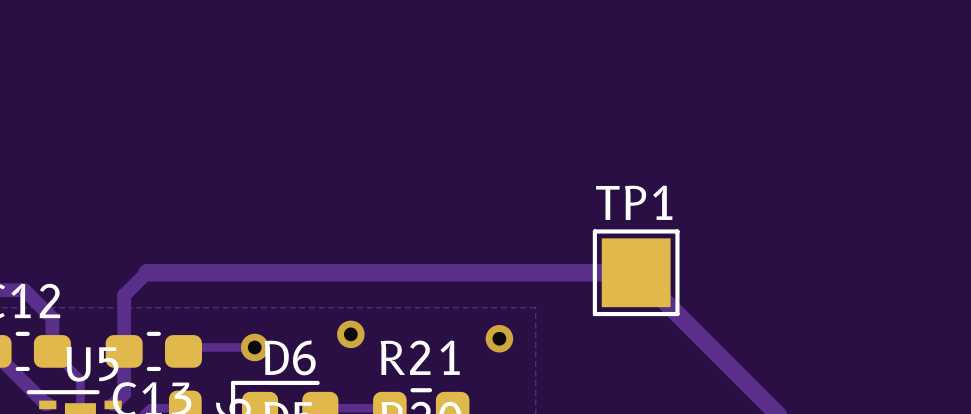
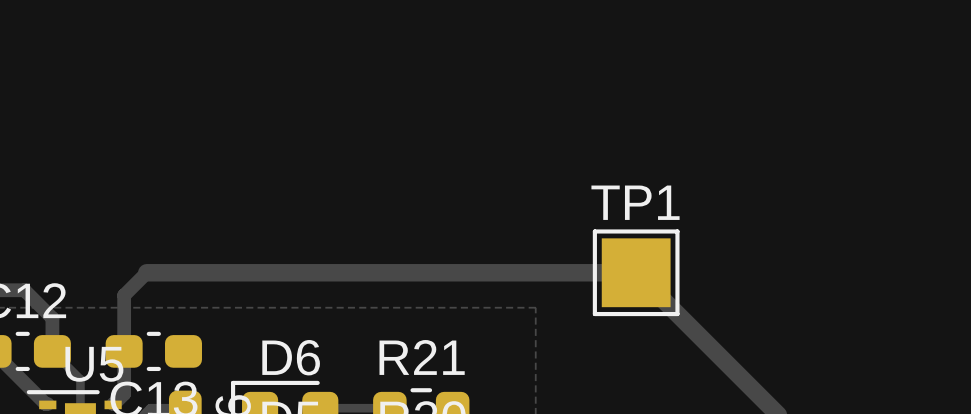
via: (350, 334) -> none
via: (499, 338) -> none
track: (254, 347) (187, 347) (183, 351) -> none
via: (254, 347) -> none

